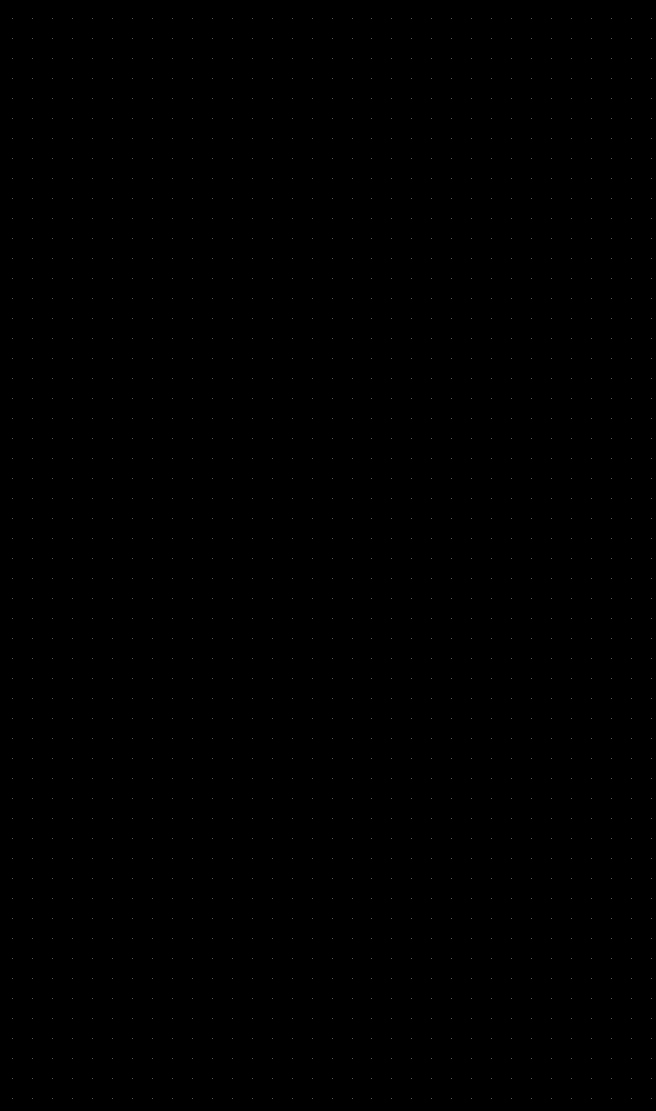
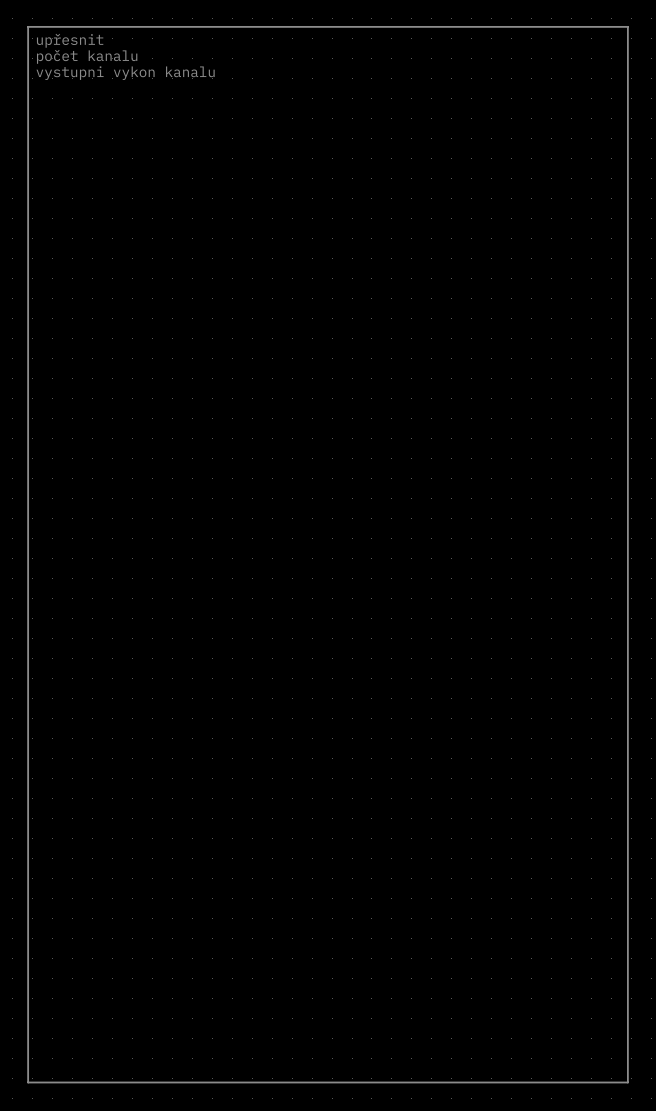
line: none -> (28, 26) (627, 26) (627, 1082) (28, 1082) (28, 26)
text: none -> upřesnit (70, 40)
text: none -> počet kanalu (87, 56)
text: none -> vystupni vykon kanalu (125, 73)

